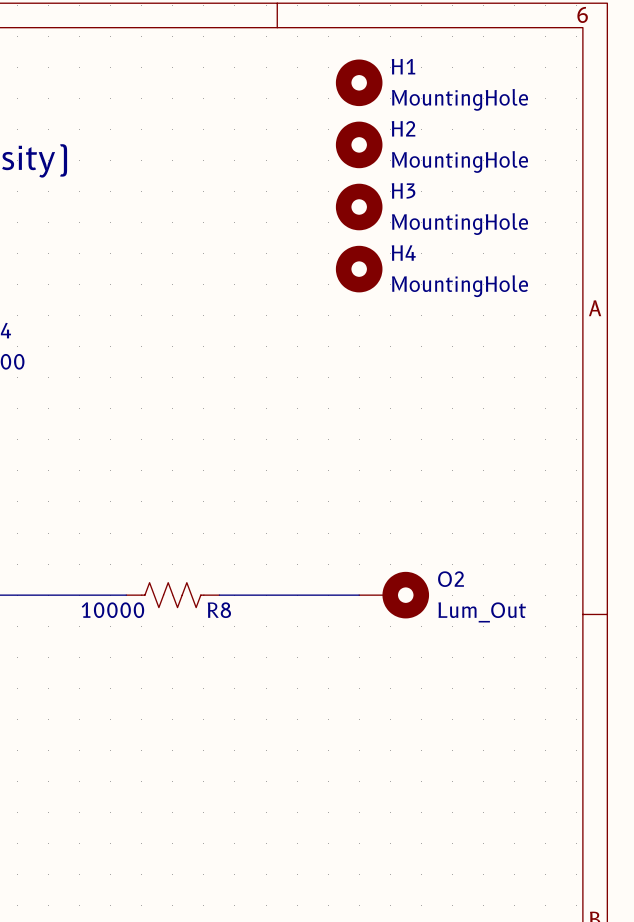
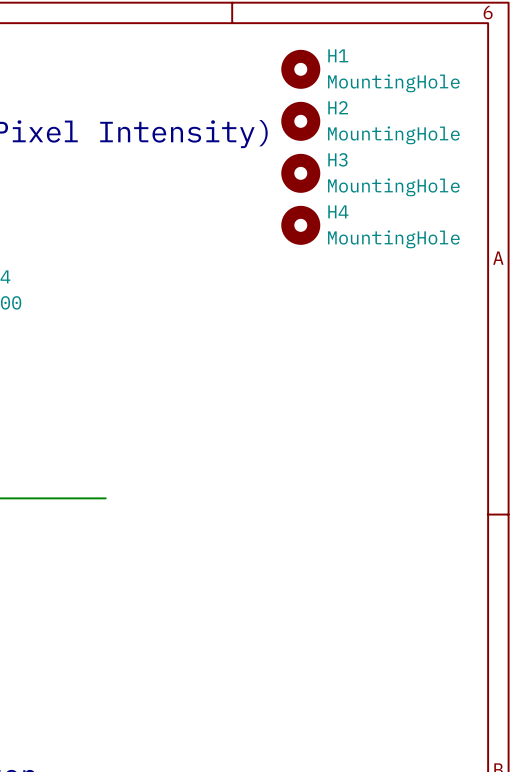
R8: 10000 (172, 595) -> none
wire: (219, 595) (359, 595) -> none
O2: Lum_Out (394, 595) -> none

